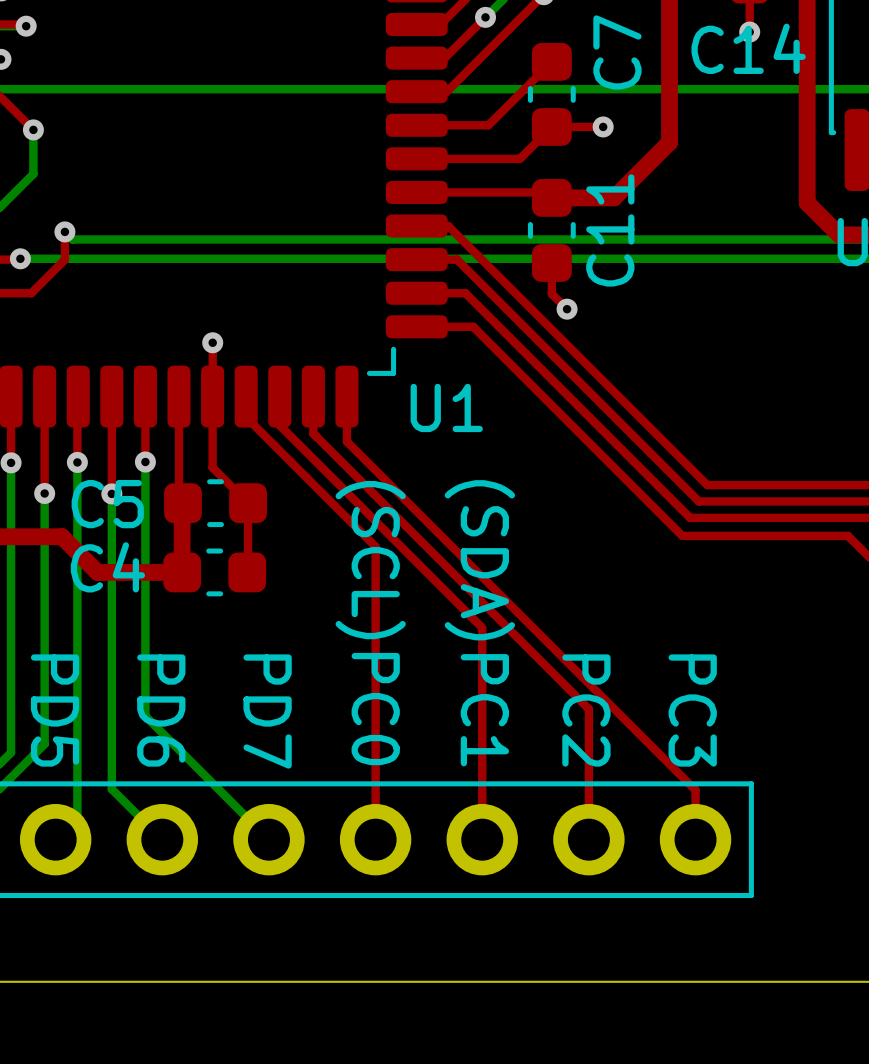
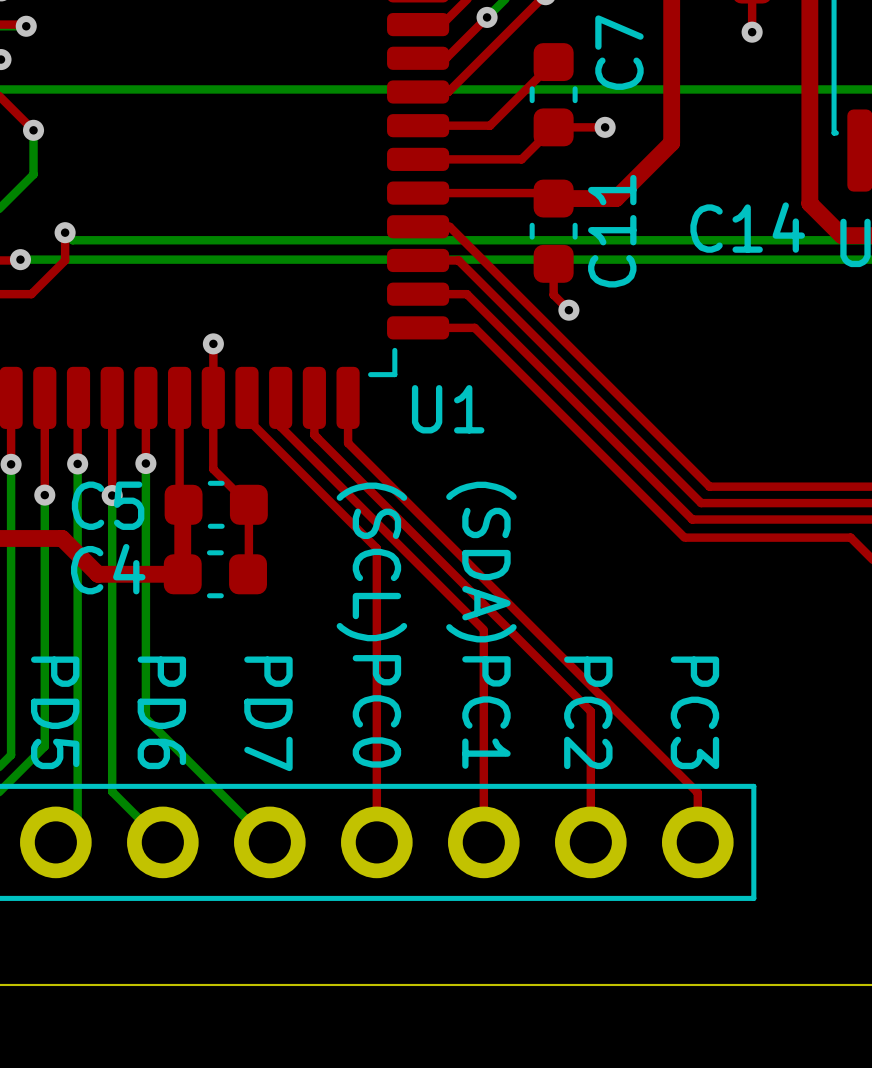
C14 name position: C14 (748, 48) -> C14 (747, 227)

